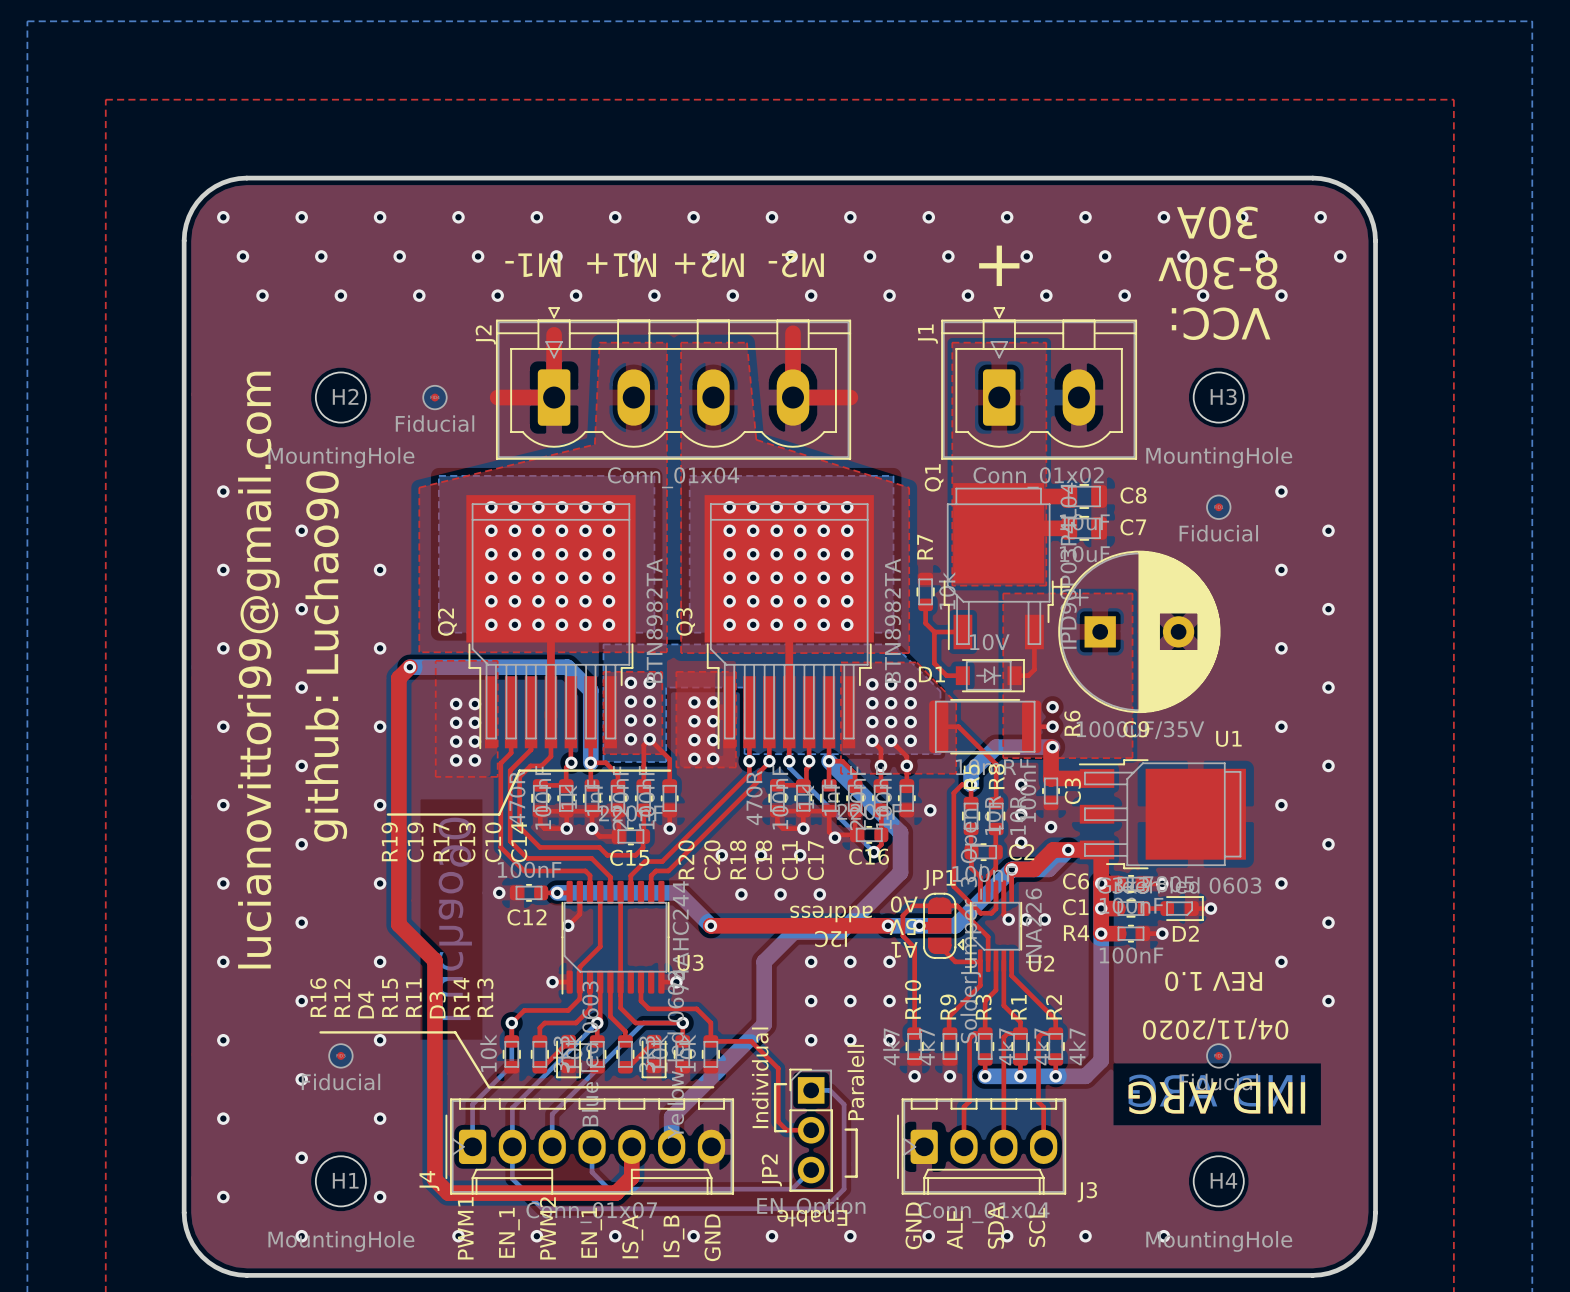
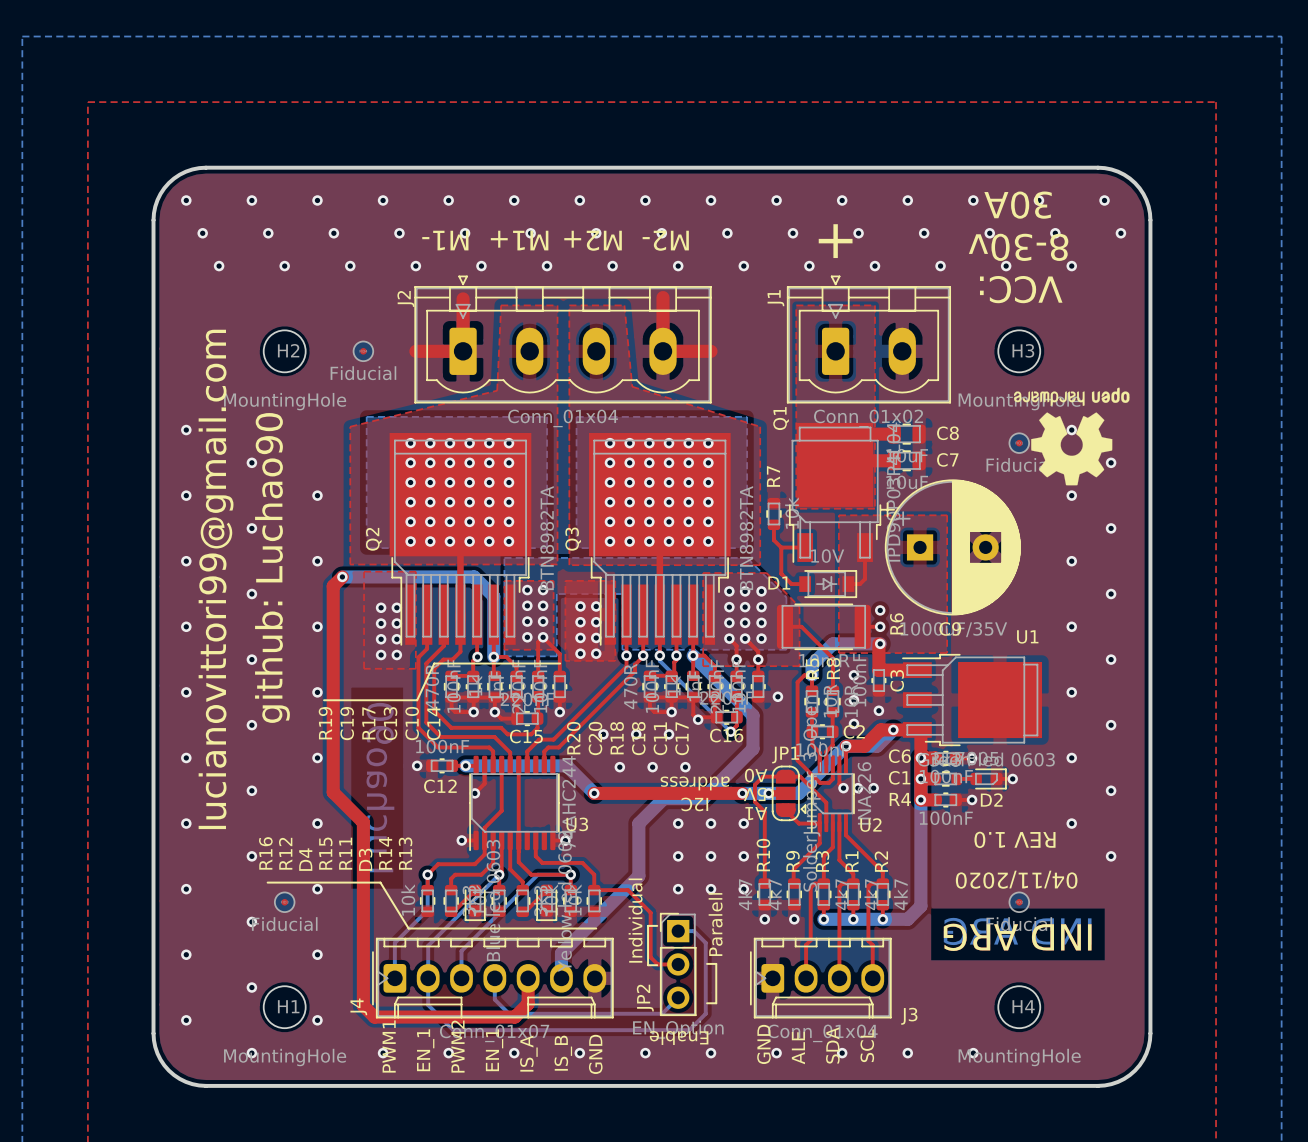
drawing: none -> [1014, 387, 1130, 486]

